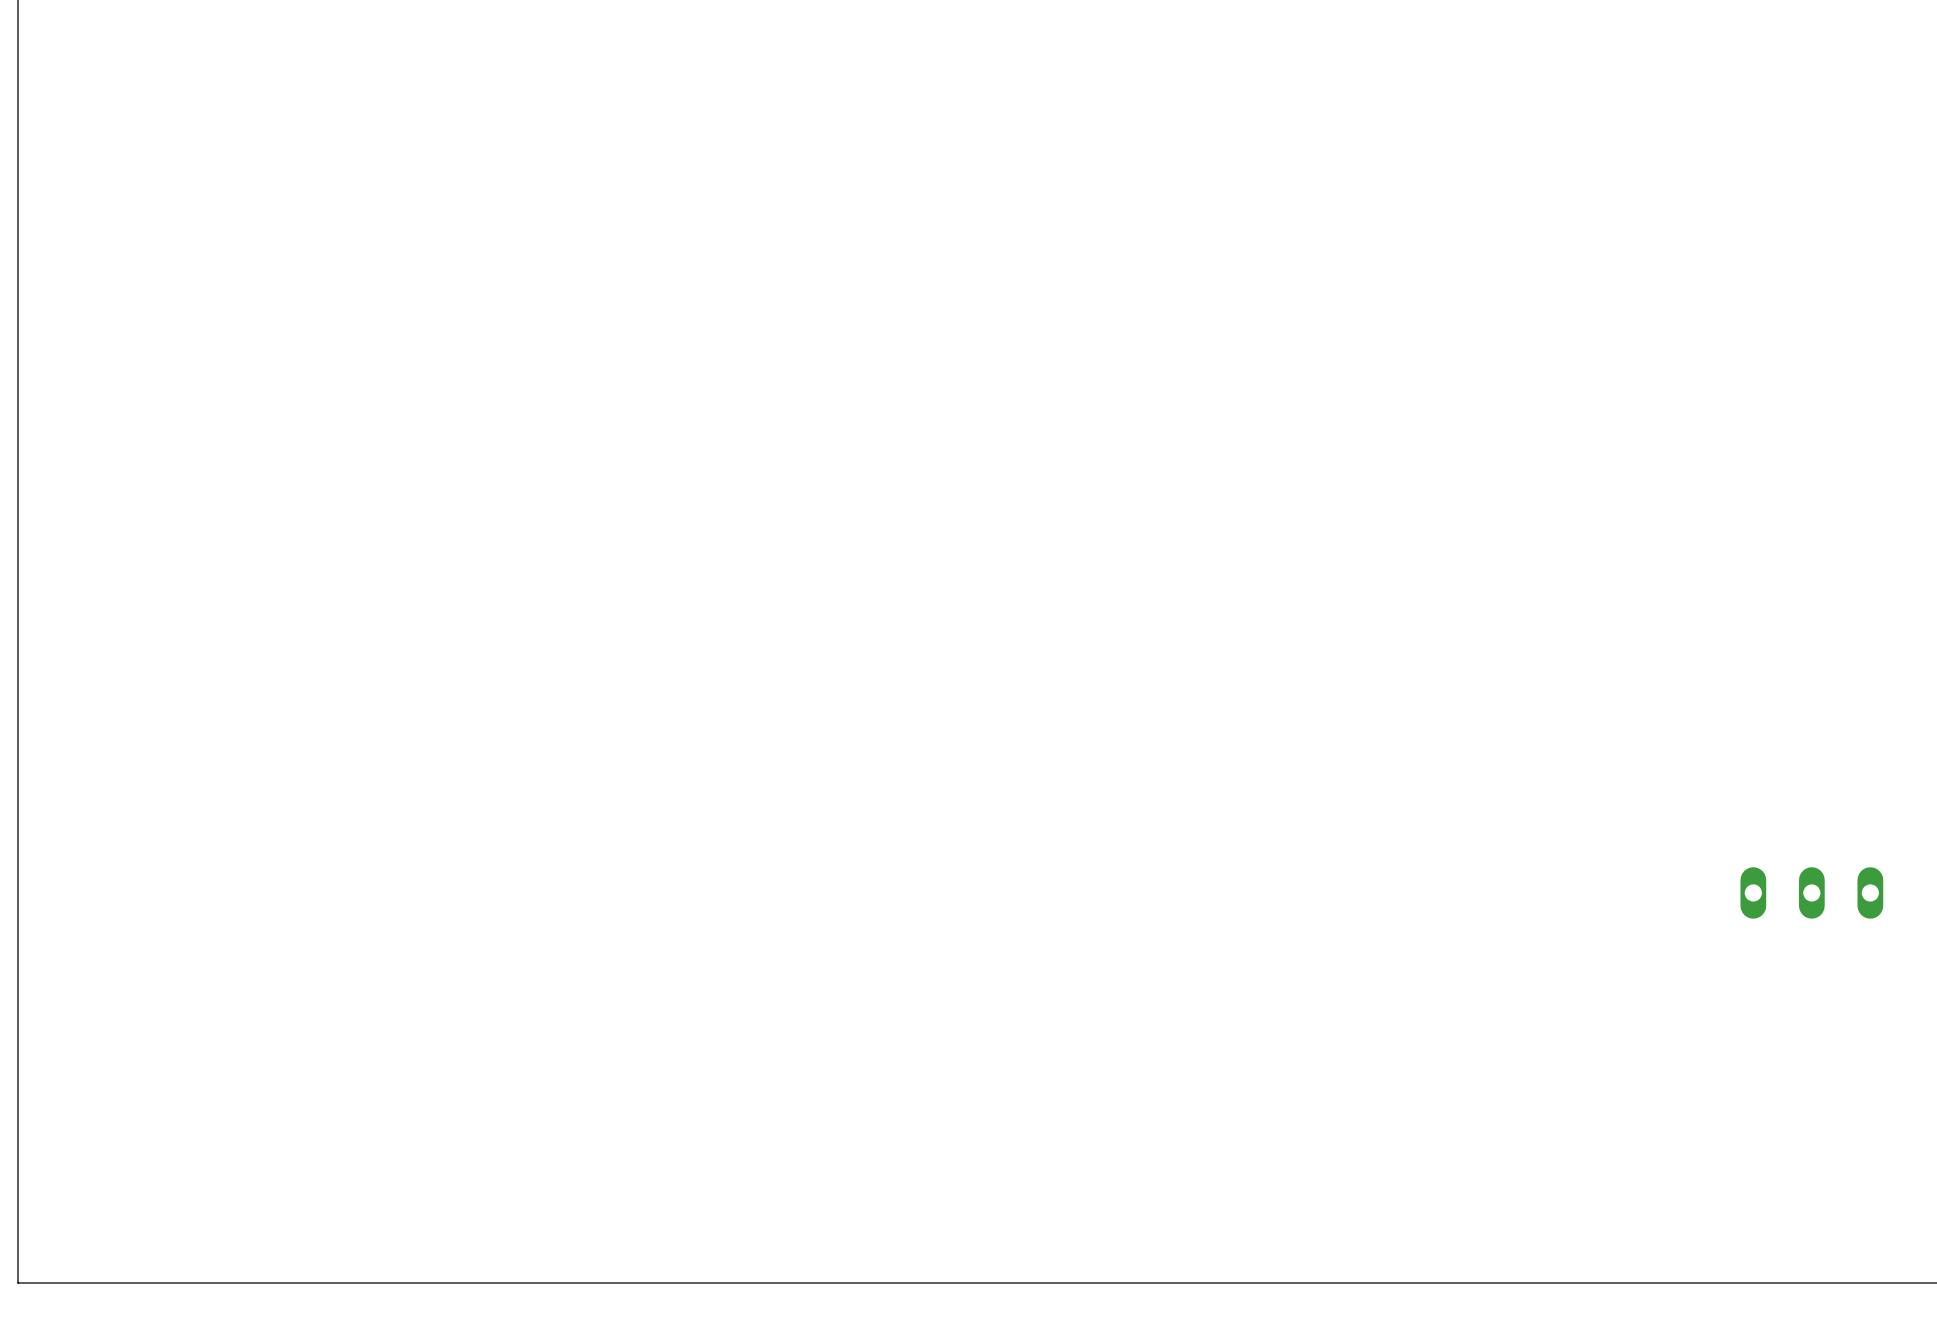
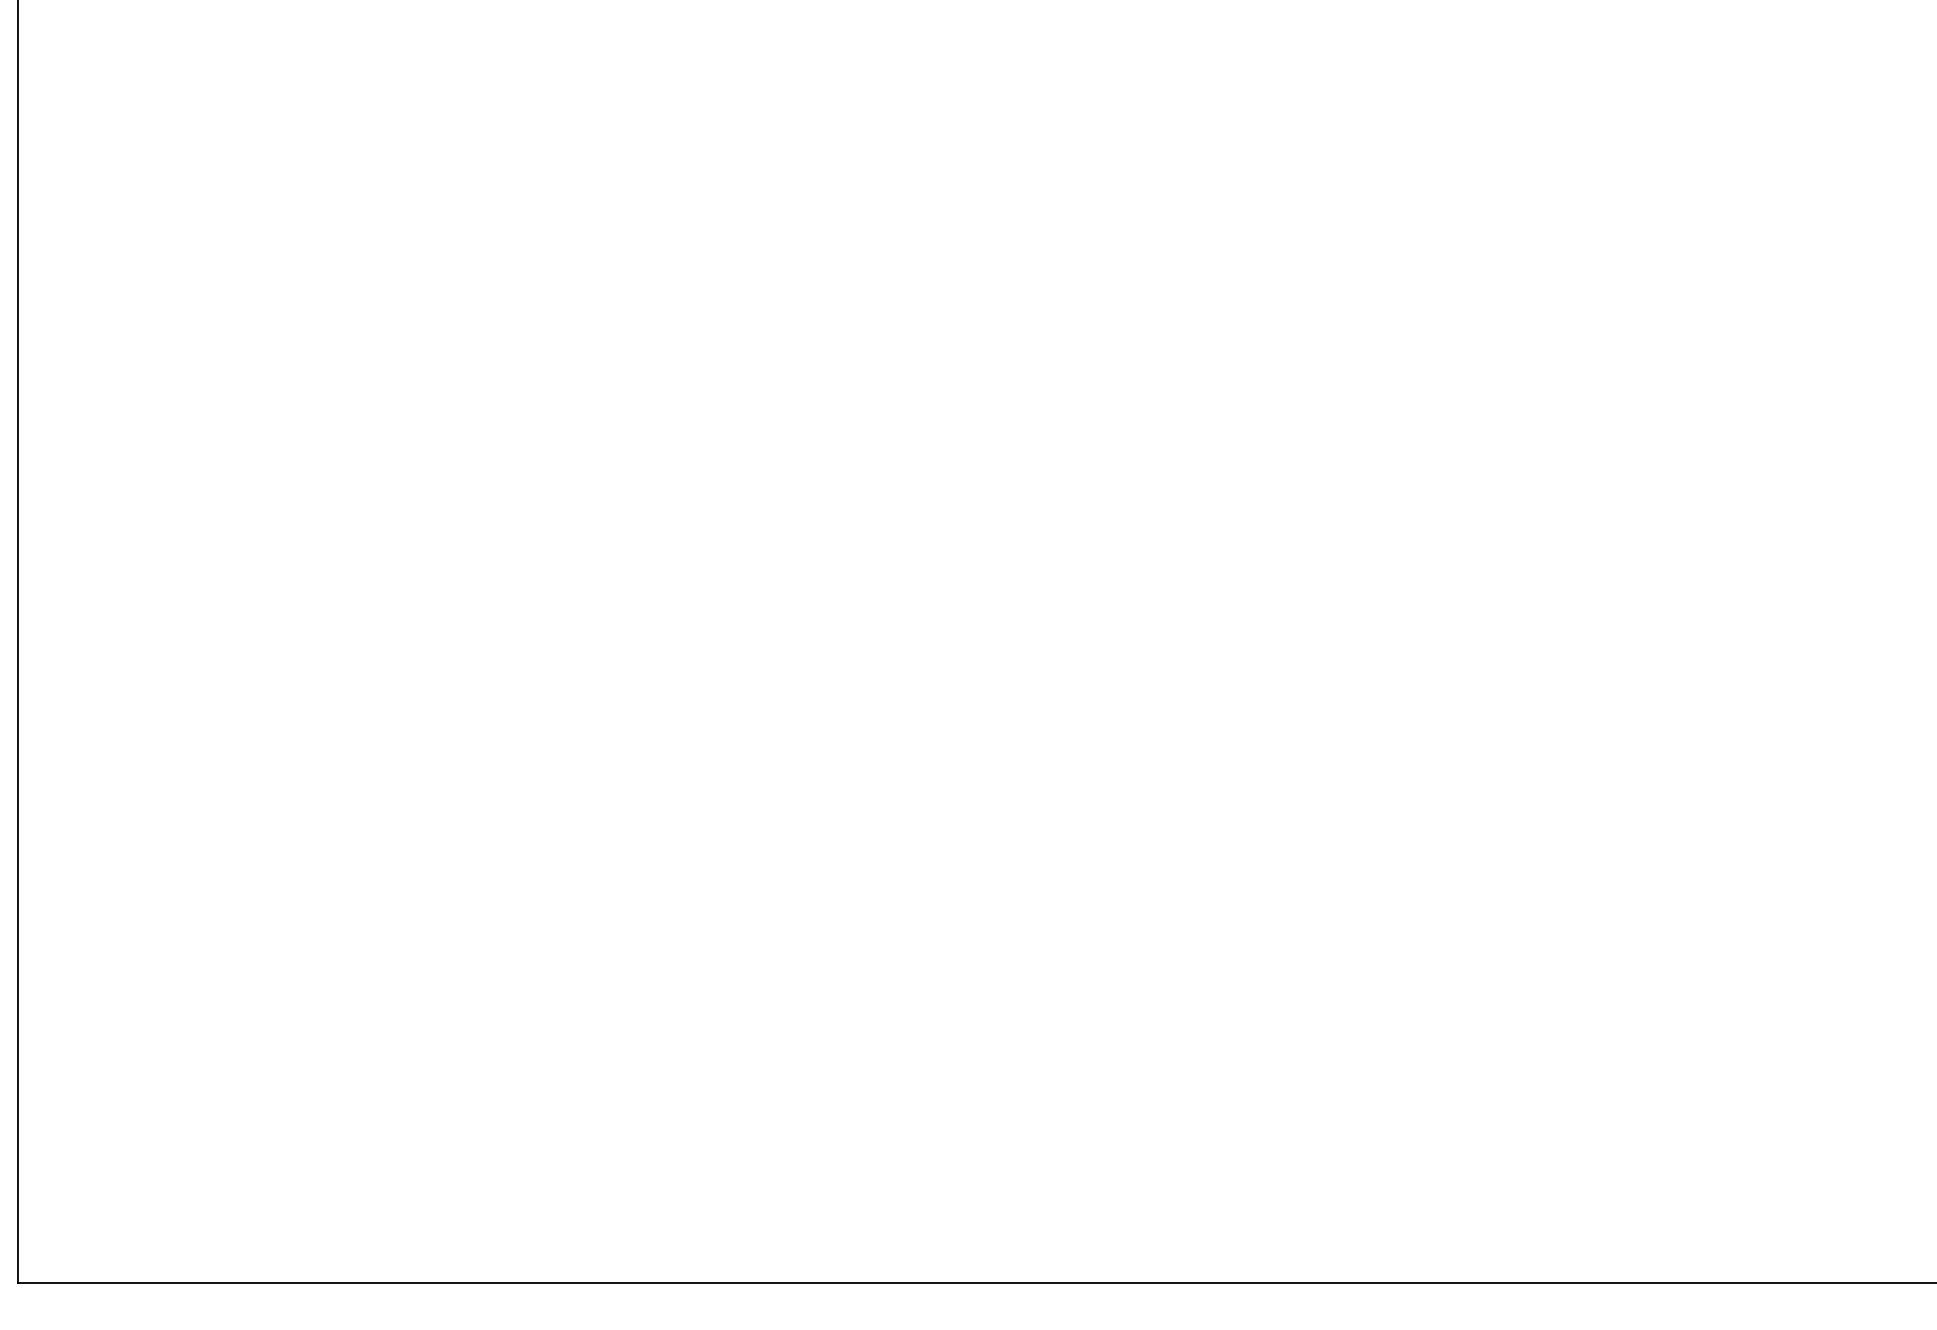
part: (1811, 892) -> none

